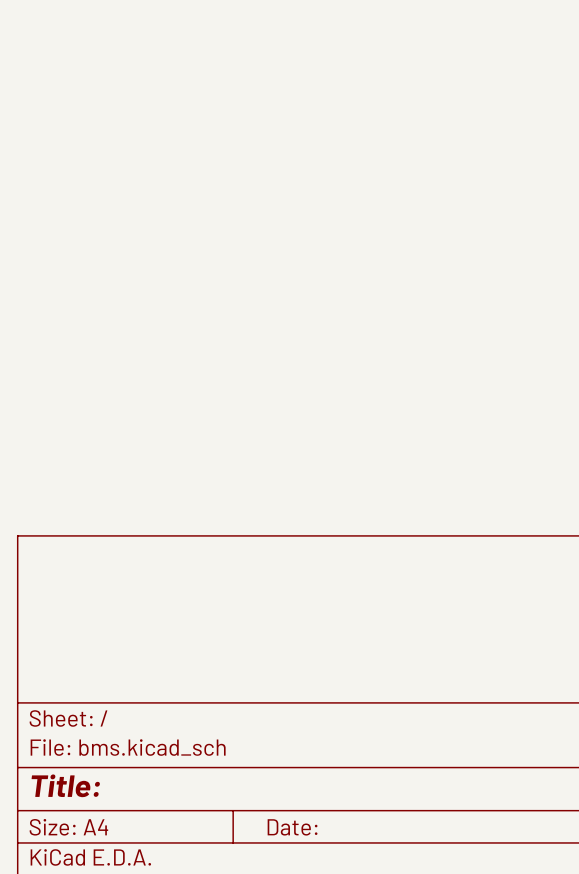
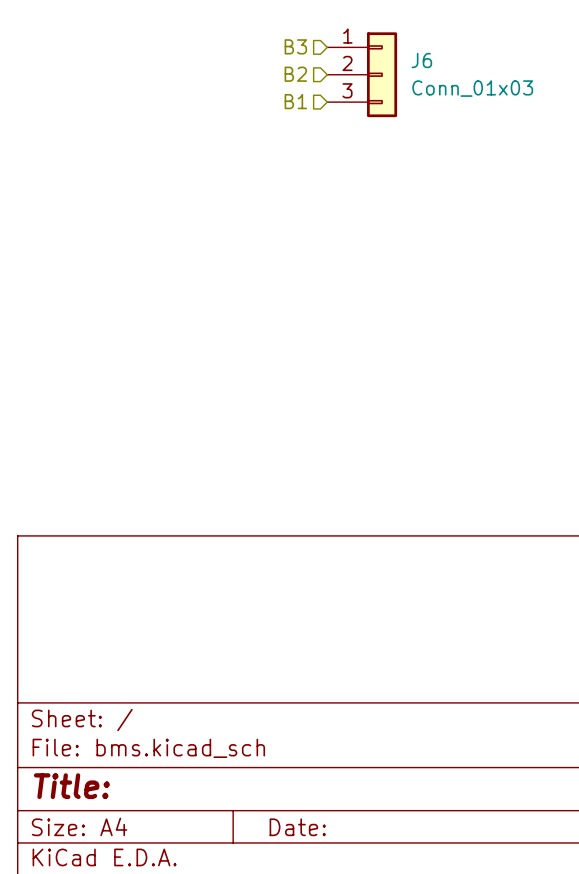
hierarchical label: none -> B3 (295, 46)
hierarchical label: none -> B2 (295, 74)
J6: none -> Conn_01x03 (362, 74)
hierarchical label: none -> B1 (295, 101)

